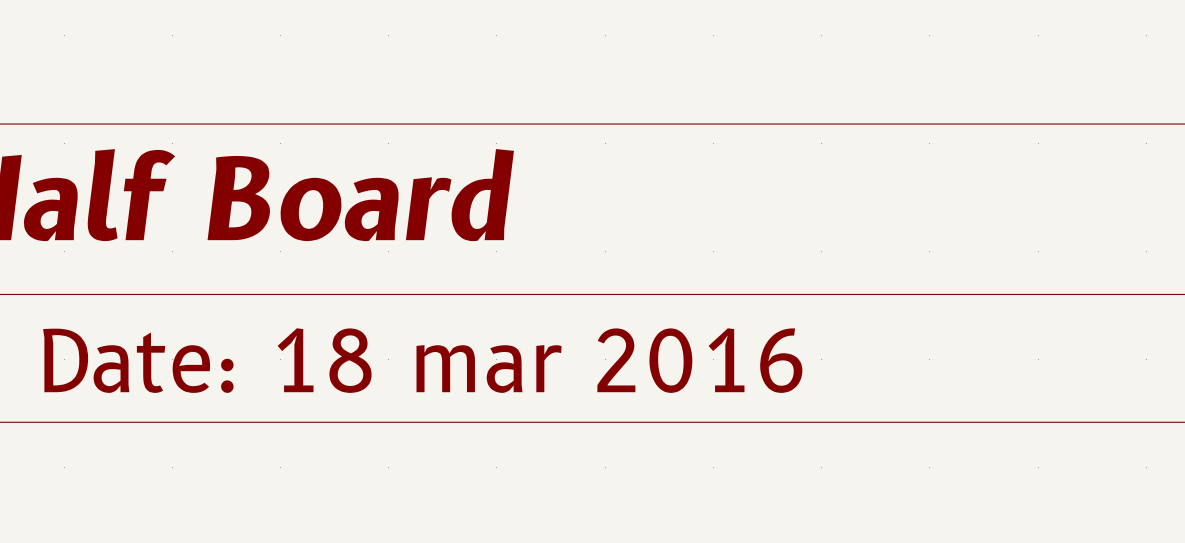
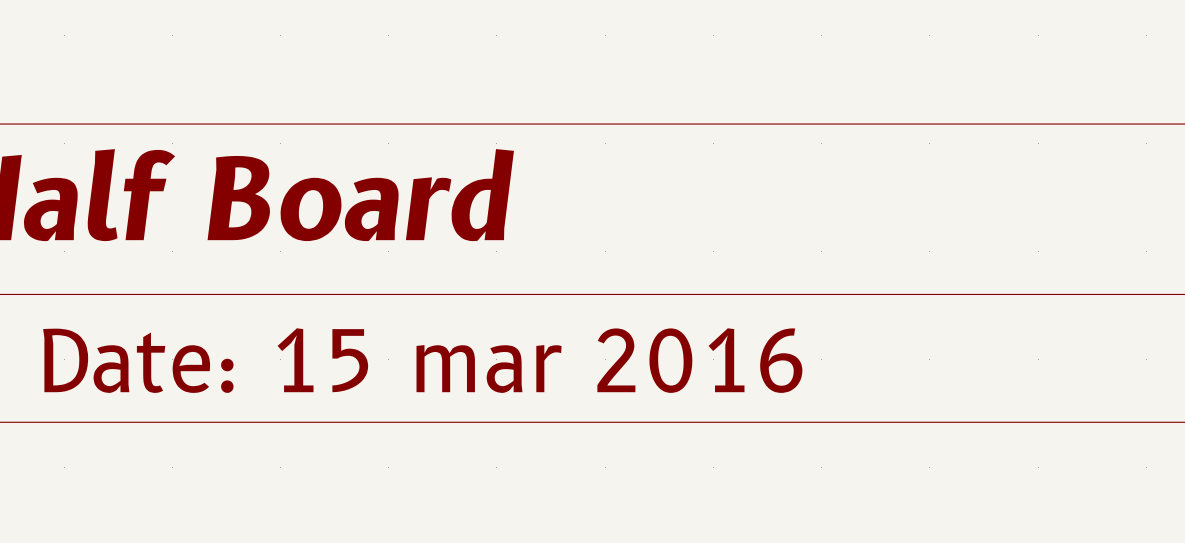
title block: Date: 18 mar 2016 (422, 360) -> Date: 15 mar 2016 (422, 360)

